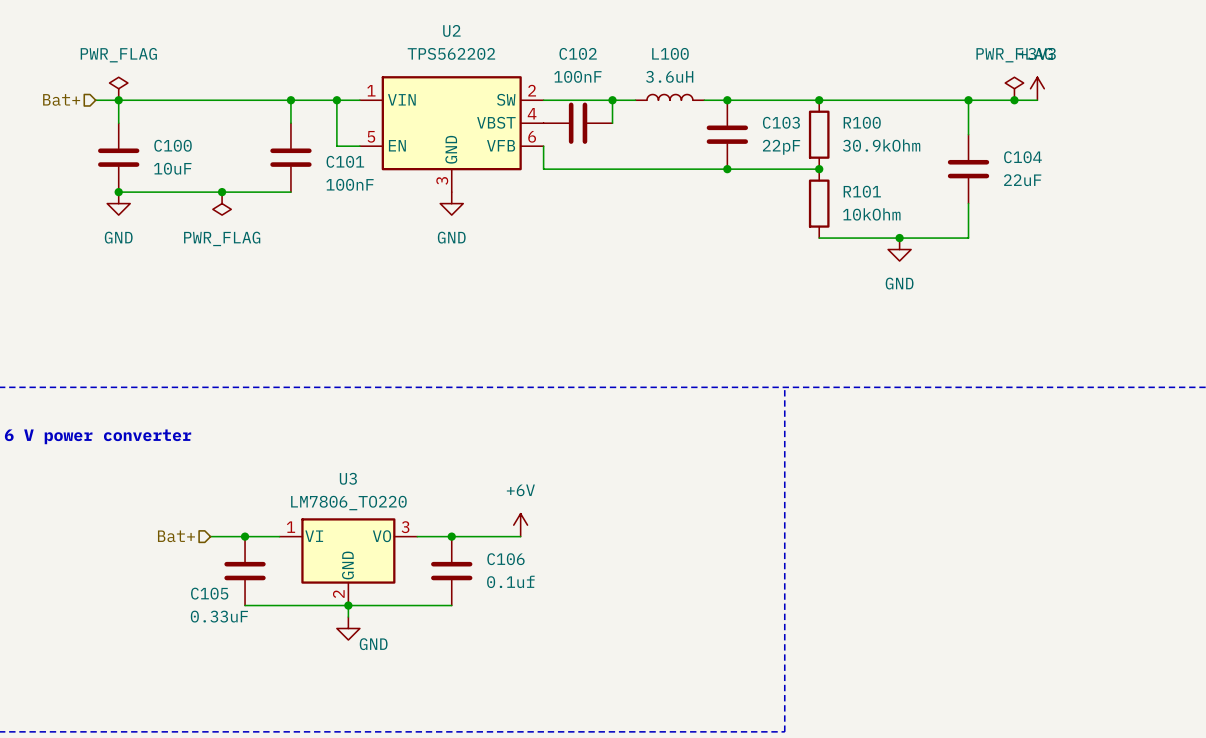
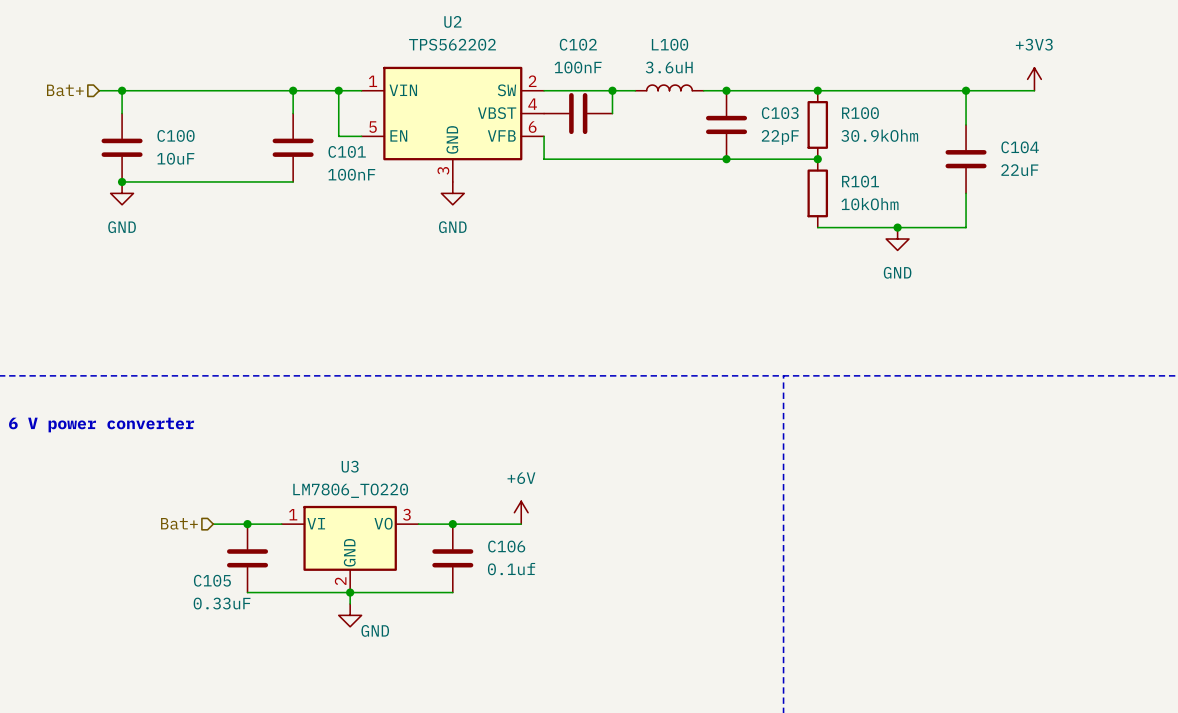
power symbol: PWR_FLAG (118, 88) -> none
power symbol: PWR_FLAG (1014, 88) -> none
junction: (1014, 100) -> none
junction: (222, 192) -> none
power symbol: PWR_FLAG (222, 203) -> none

